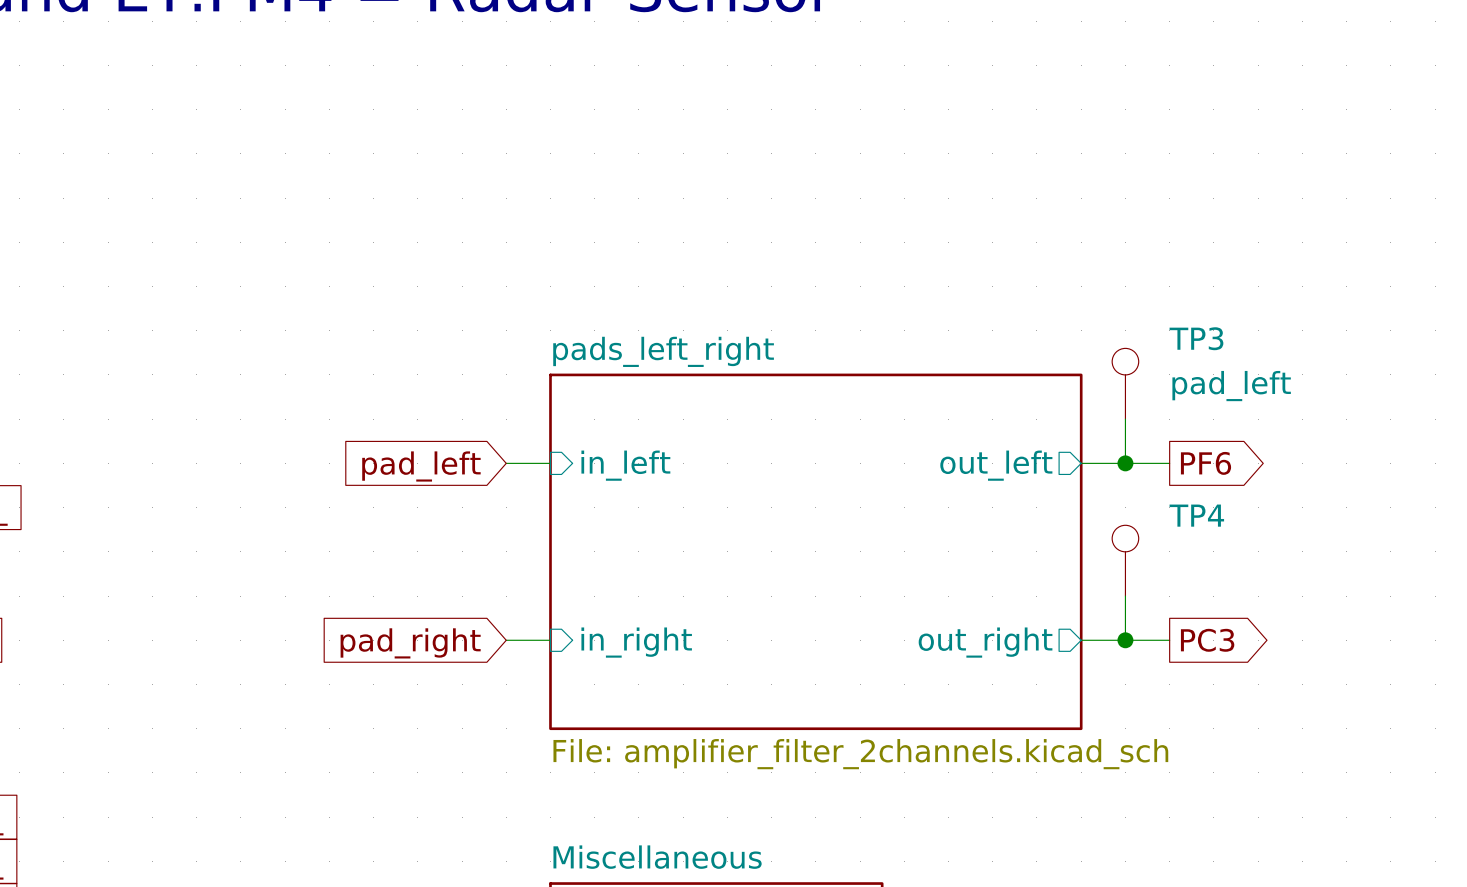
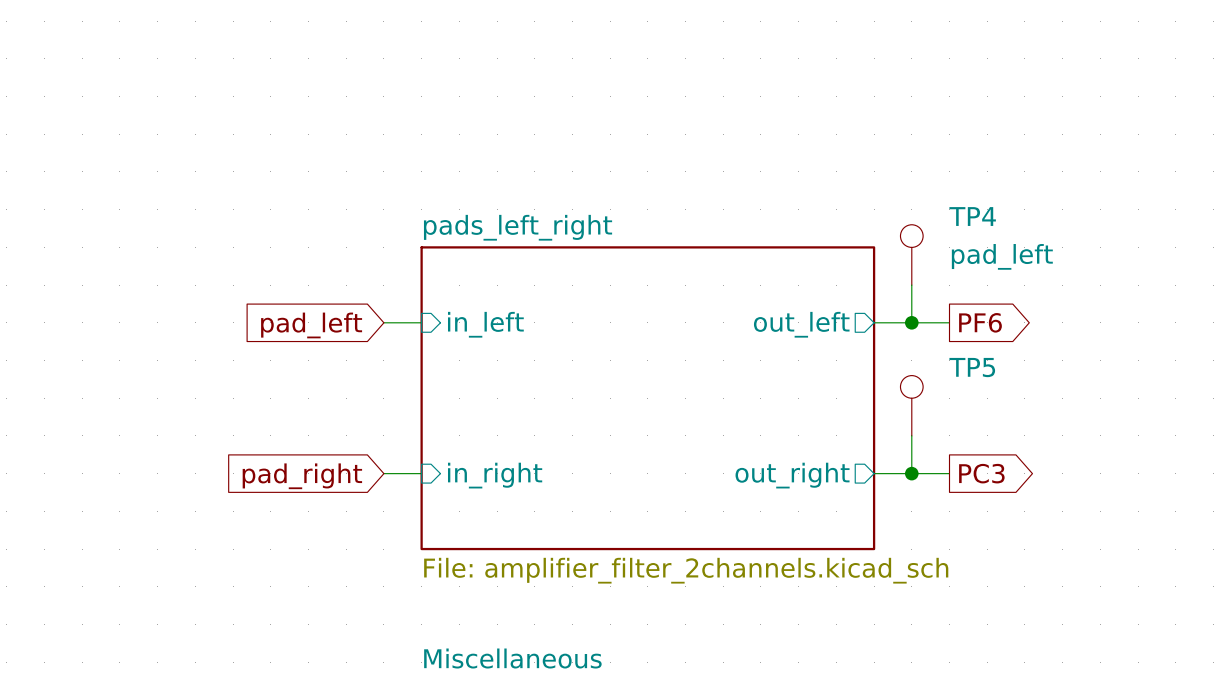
TP3 name: TP3 (1196, 338) -> TP4 (972, 216)
TP4 name: TP4 (1196, 515) -> TP5 (972, 367)

